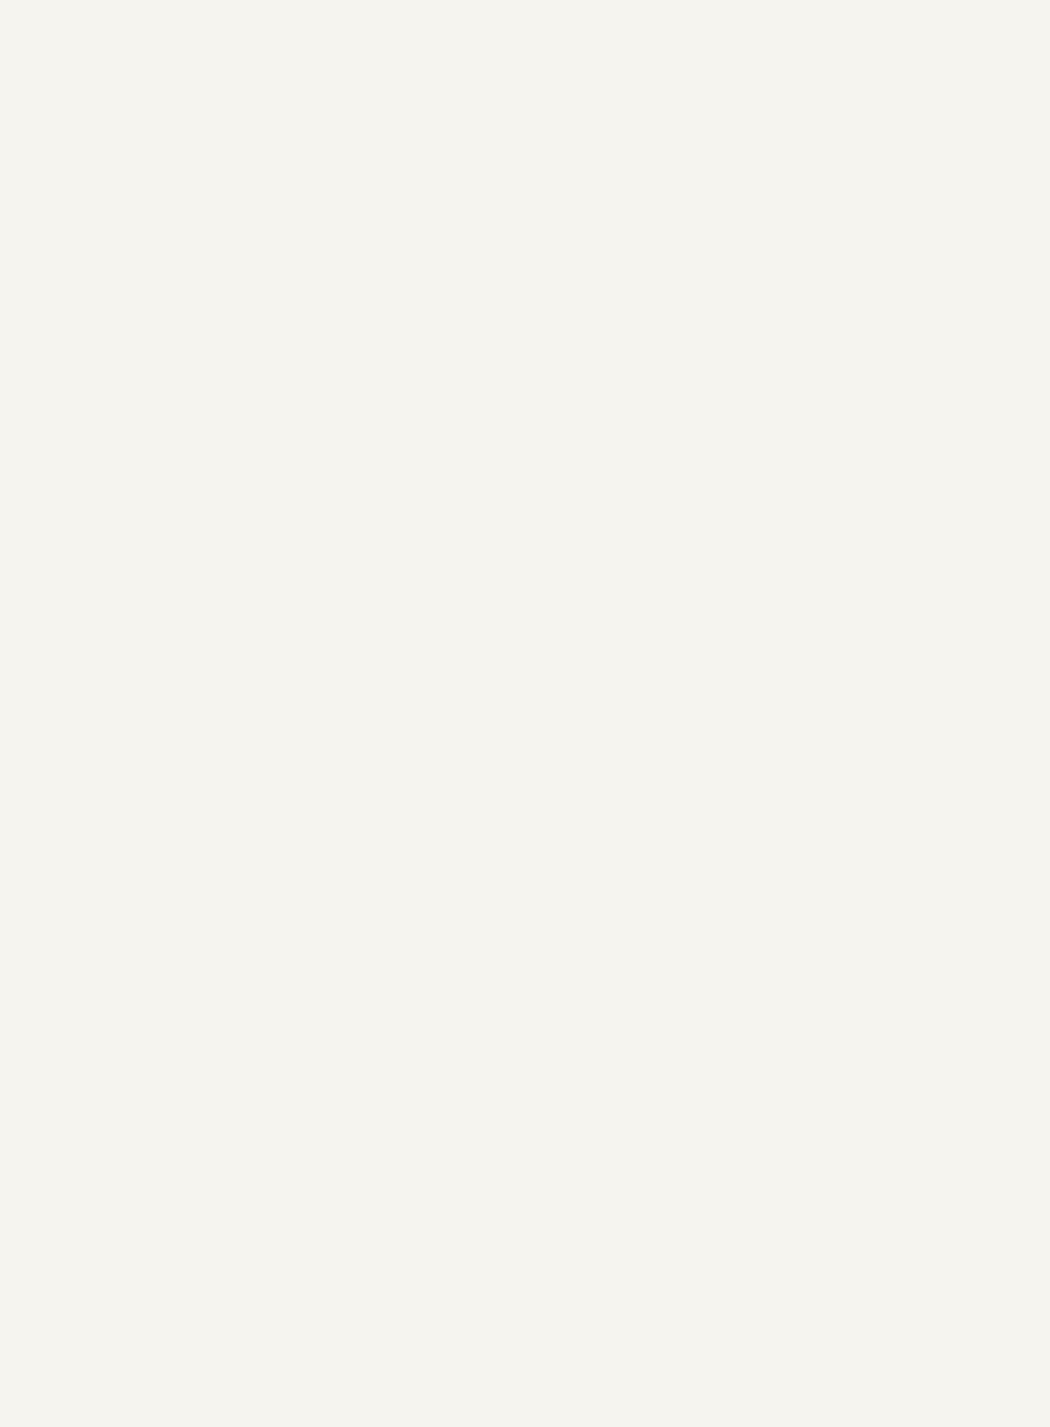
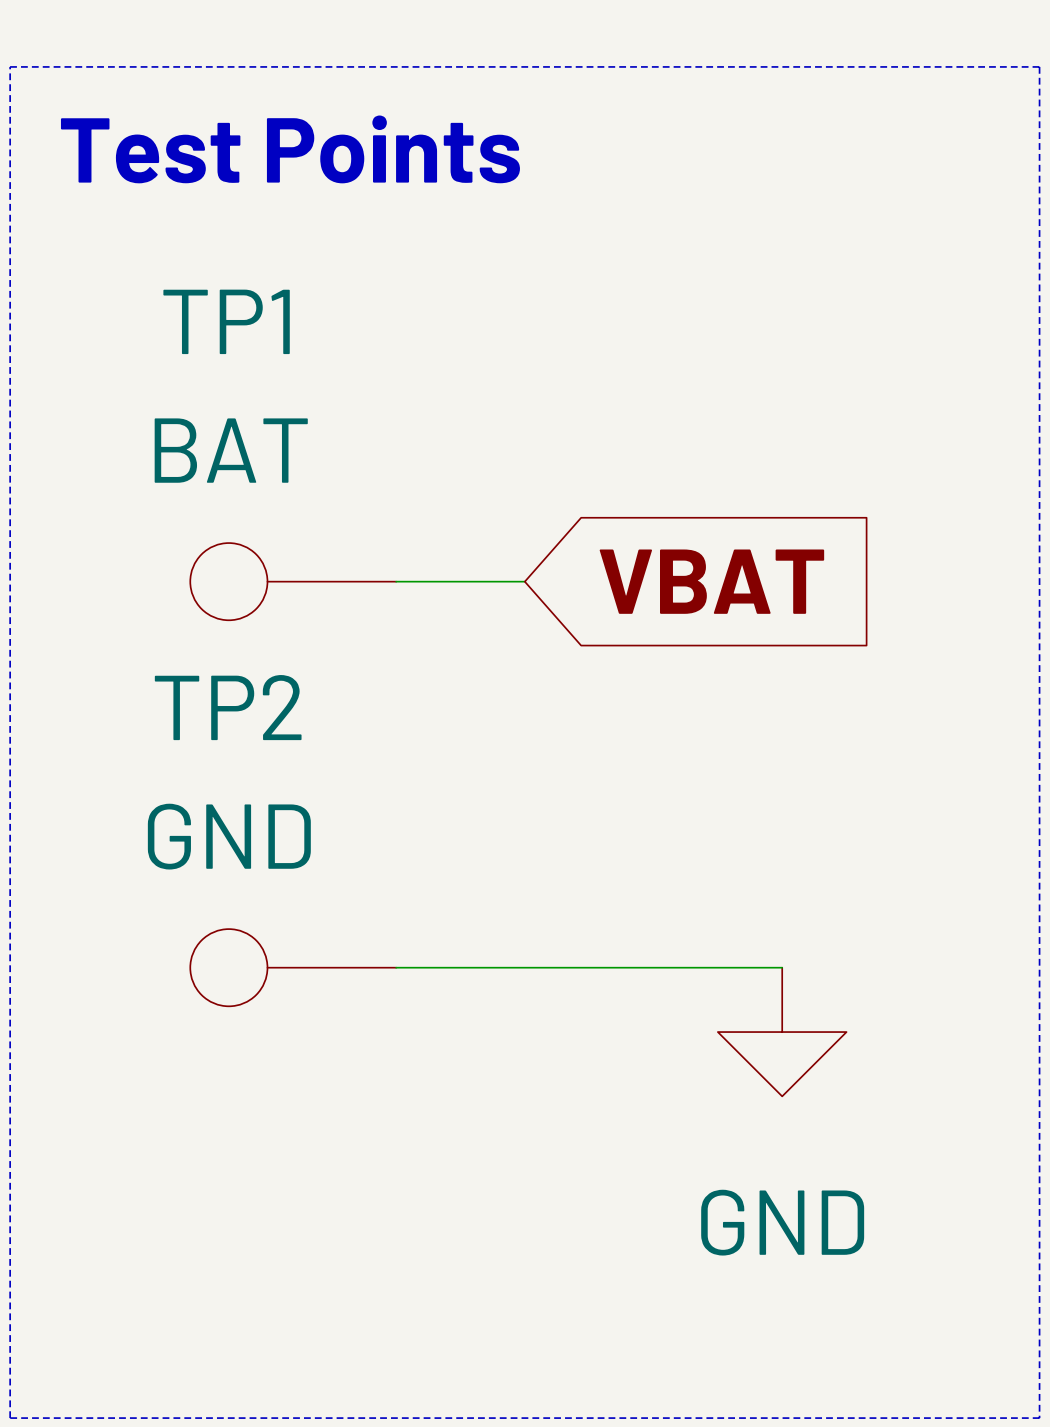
line: none -> (10, 66) (1039, 66) (1039, 1418) (10, 1418) (10, 66)
text: none -> Test Points (290, 149)
TP1: none -> BAT (293, 581)
wire: none -> (396, 581) (524, 581)
global label: none -> VBAT (711, 581)
TP2: none -> GND (293, 967)
wire: none -> (396, 967) (782, 967)
power symbol: none -> GND (782, 1032)

